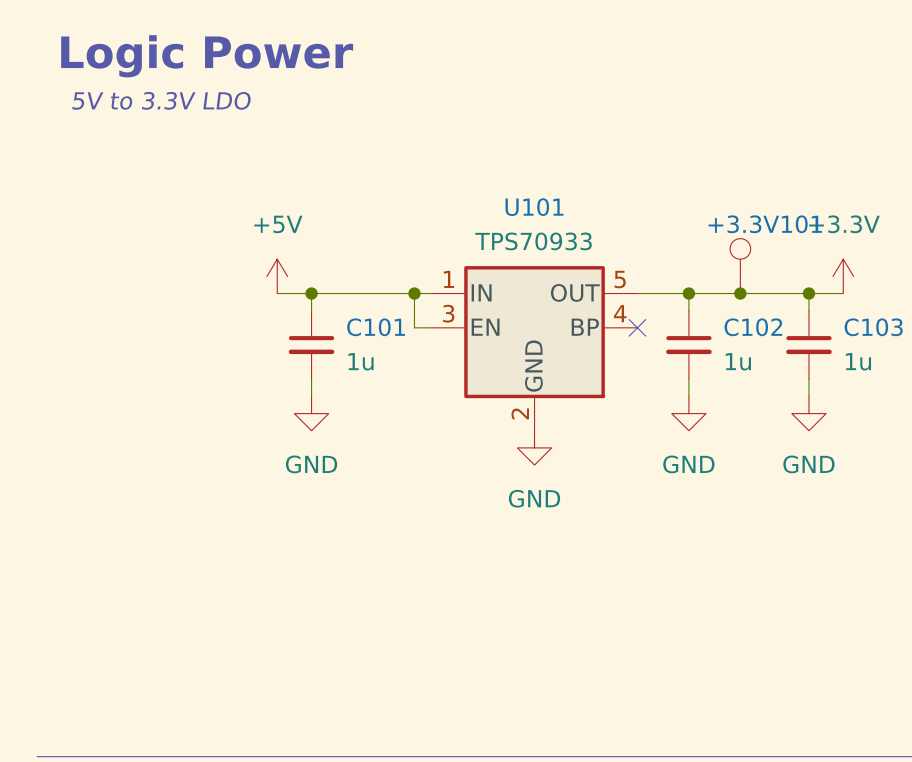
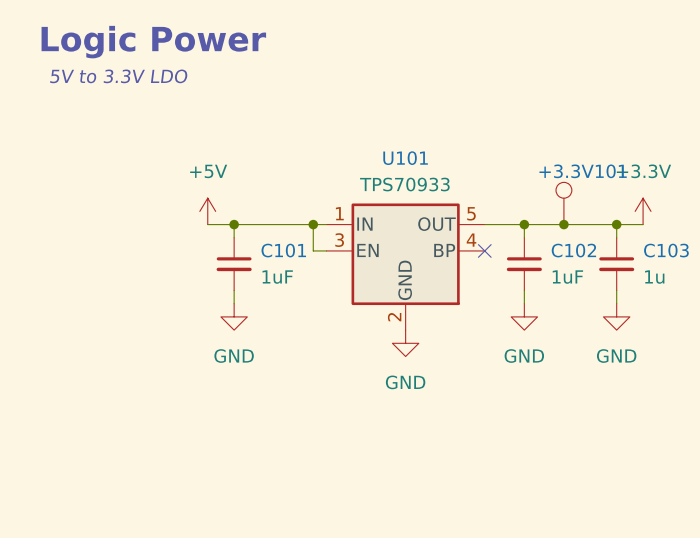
C101 value: 1u (361, 361) -> 1uF (277, 277)
C102 value: 1u (738, 361) -> 1uF (567, 277)

